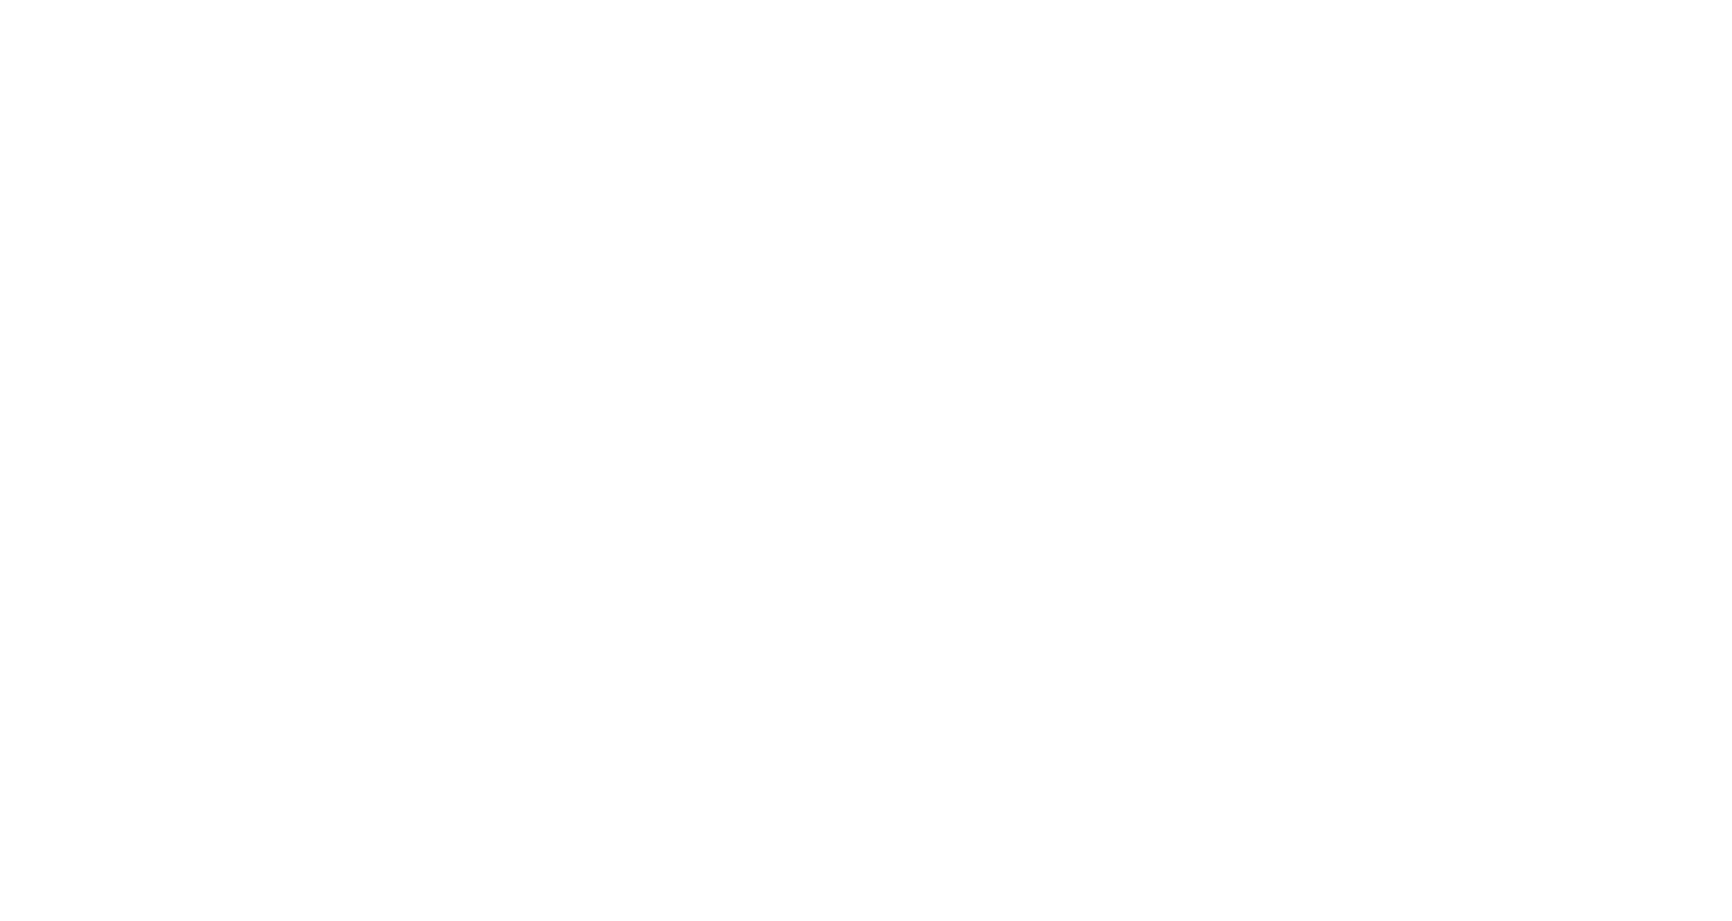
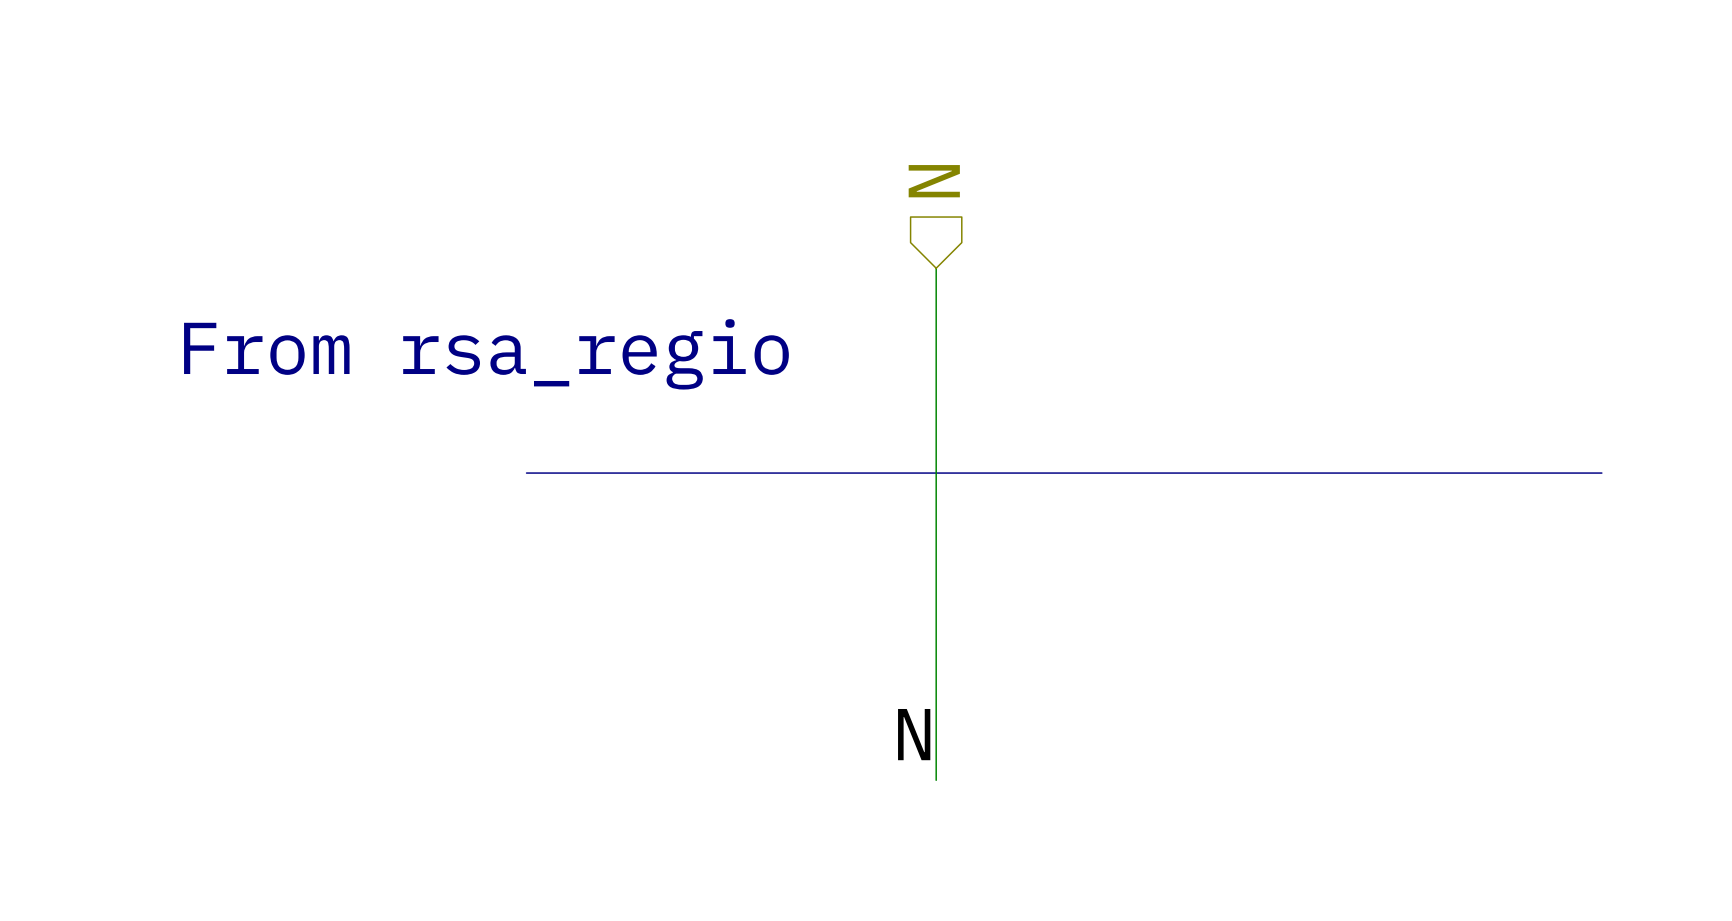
hierarchical label: none -> N (934, 181)
wire: none -> (936, 268) (936, 780)
text: none -> From rsa_regio (486, 354)
line: none -> (526, 473) (1601, 473)
label: none -> N (914, 734)

